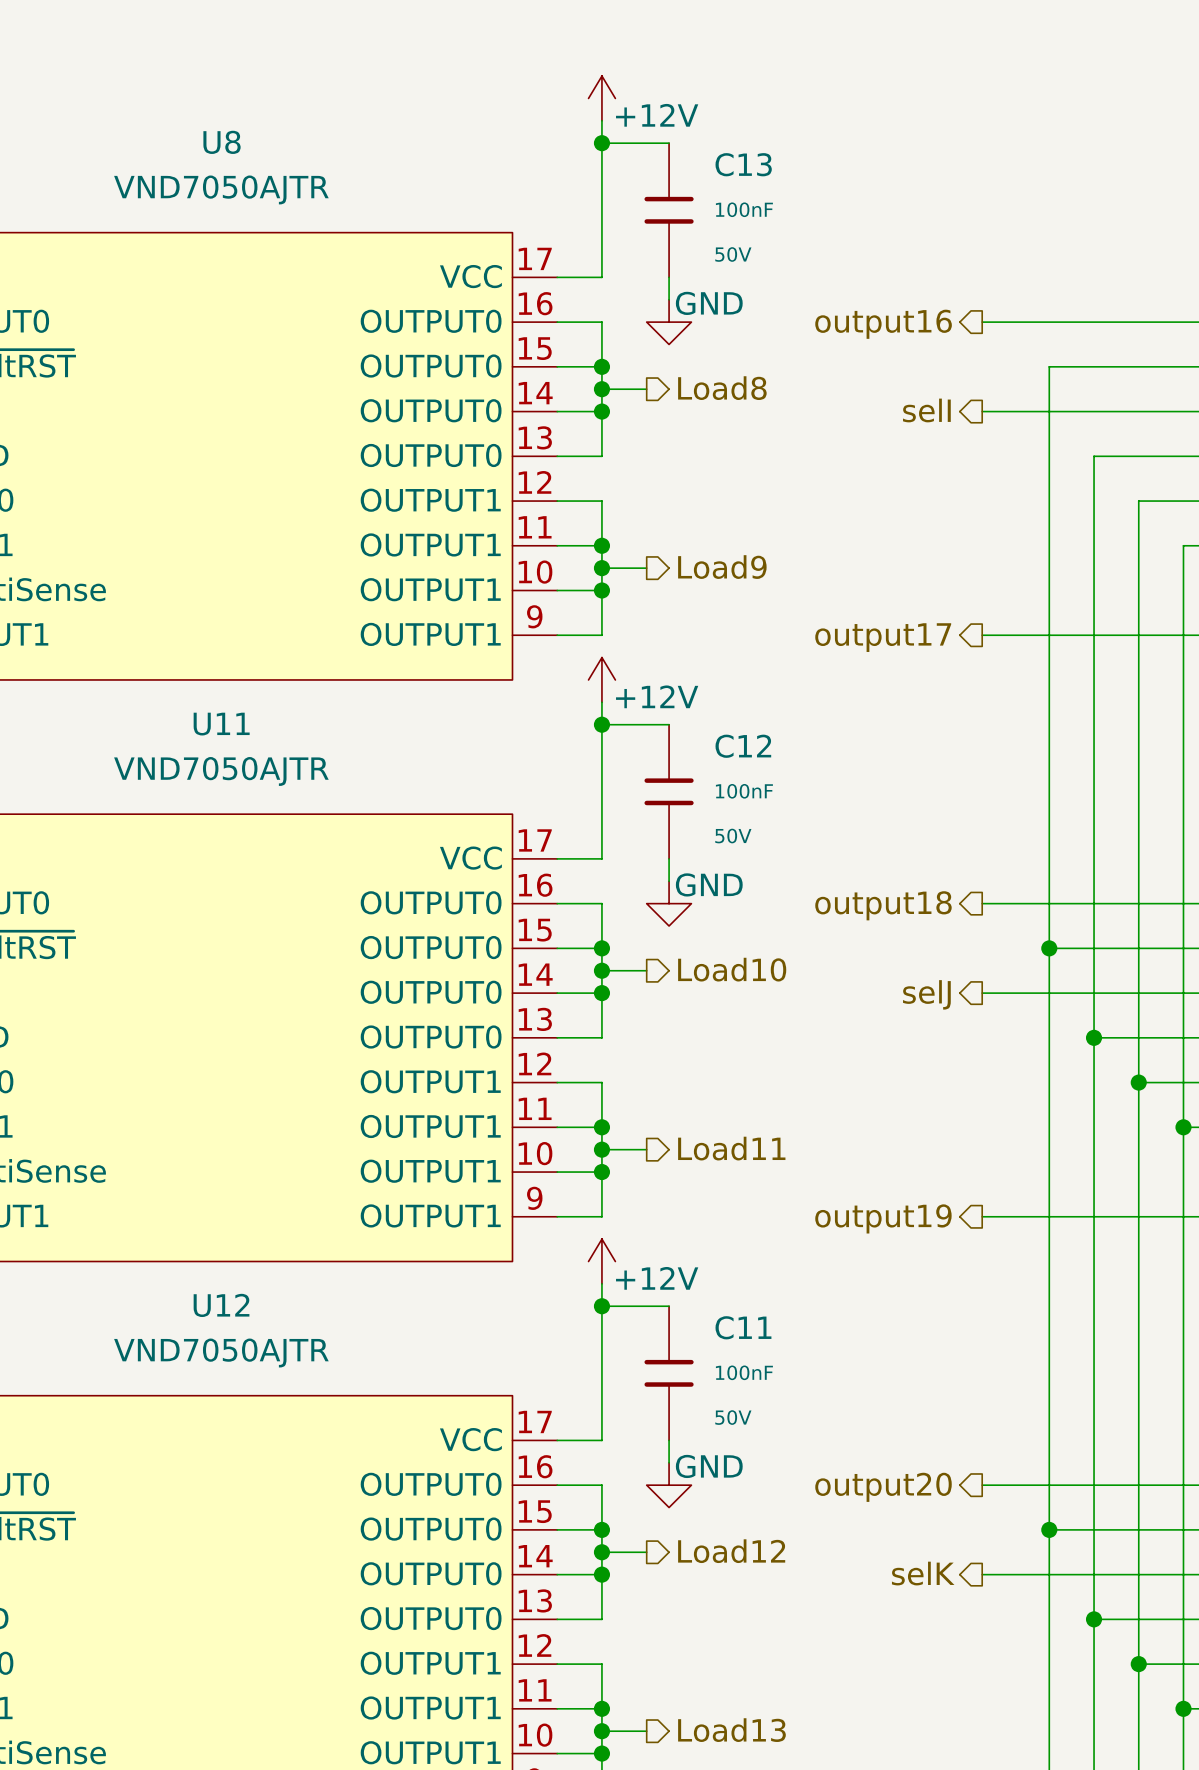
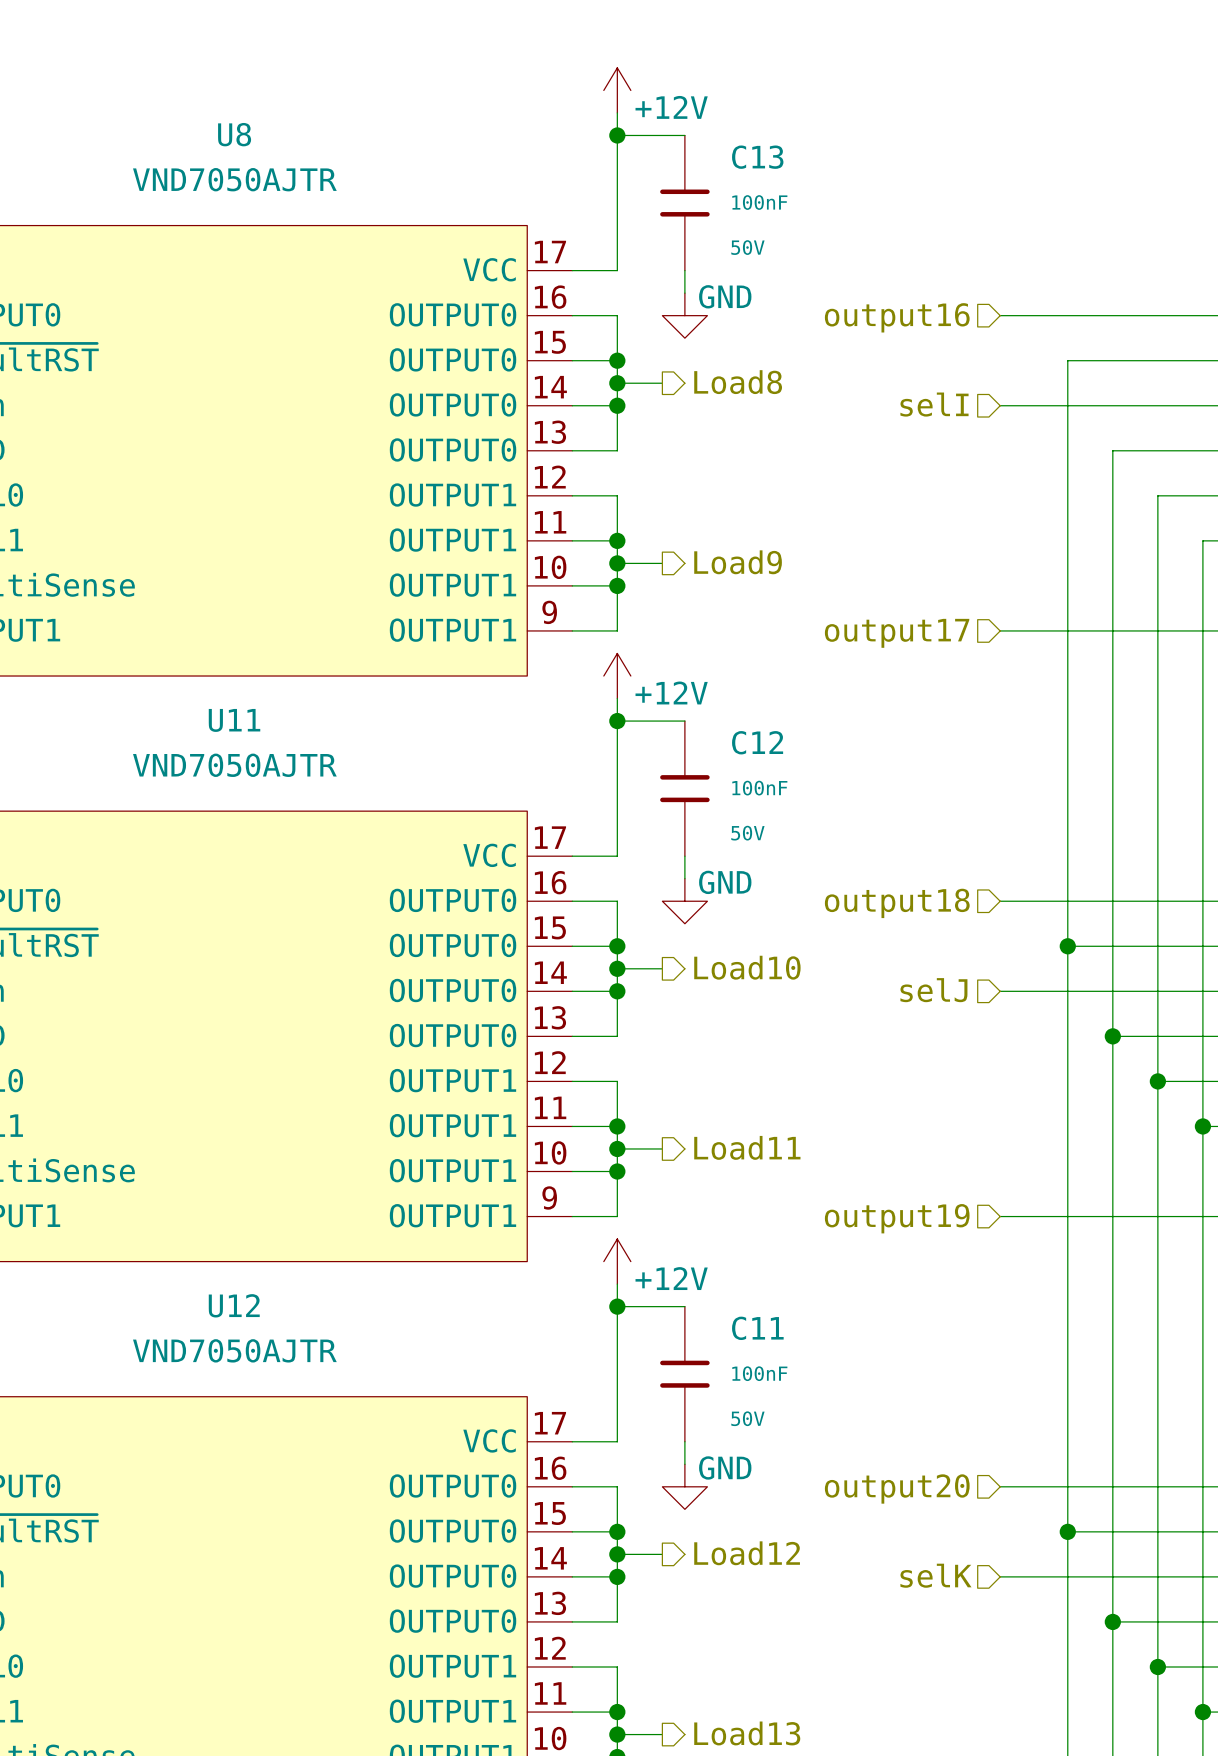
hierarchical label shape: output (883, 324) -> input (897, 317)
hierarchical label shape: output (926, 410) -> input (934, 404)
hierarchical label shape: output (883, 637) -> input (897, 633)
hierarchical label shape: output (883, 905) -> input (897, 903)
hierarchical label shape: output (926, 994) -> input (933, 990)
hierarchical label shape: output (883, 1218) -> input (897, 1218)
hierarchical label shape: output (883, 1487) -> input (897, 1488)
hierarchical label shape: output (923, 1573) -> input (935, 1575)

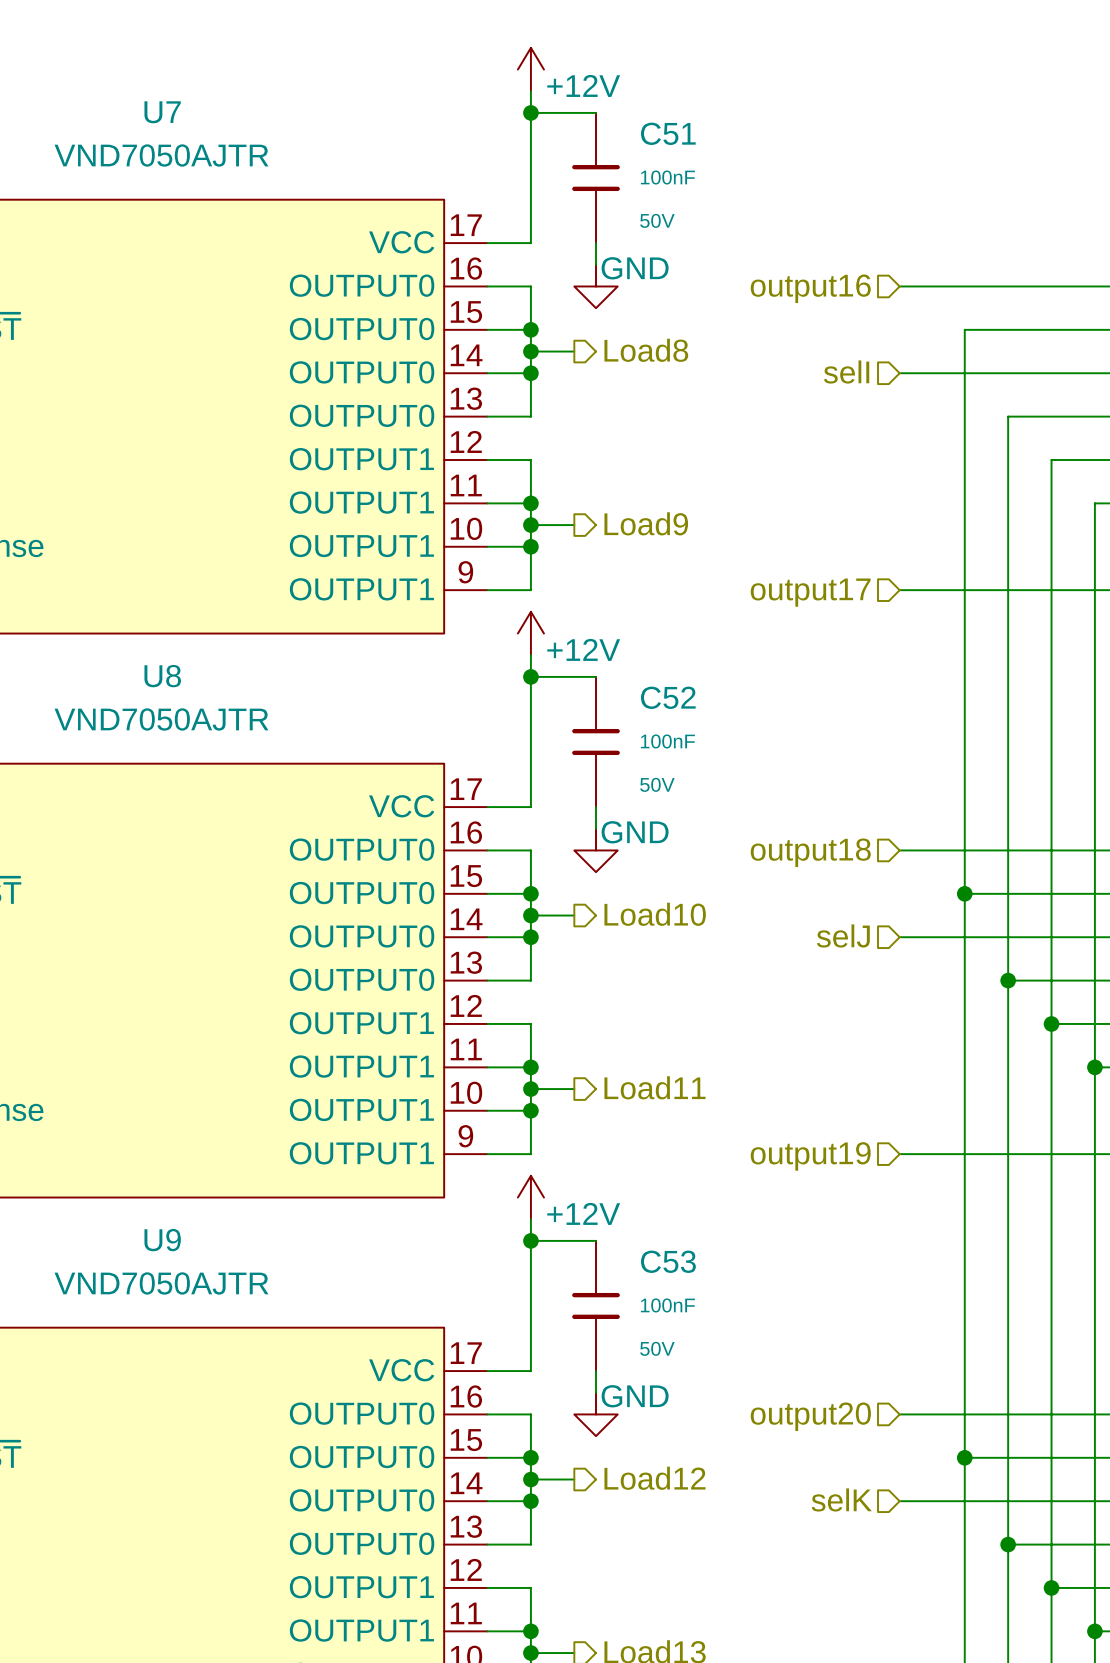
U8 name: U8 (234, 134) -> U7 (162, 112)
C13 name: C13 (757, 157) -> C51 (668, 133)
U11 name: U11 (234, 720) -> U8 (162, 676)
C12 name: C12 (757, 742) -> C52 (668, 697)
U12 name: U12 (234, 1305) -> U9 (162, 1240)
C11 name: C11 (757, 1328) -> C53 (668, 1261)

